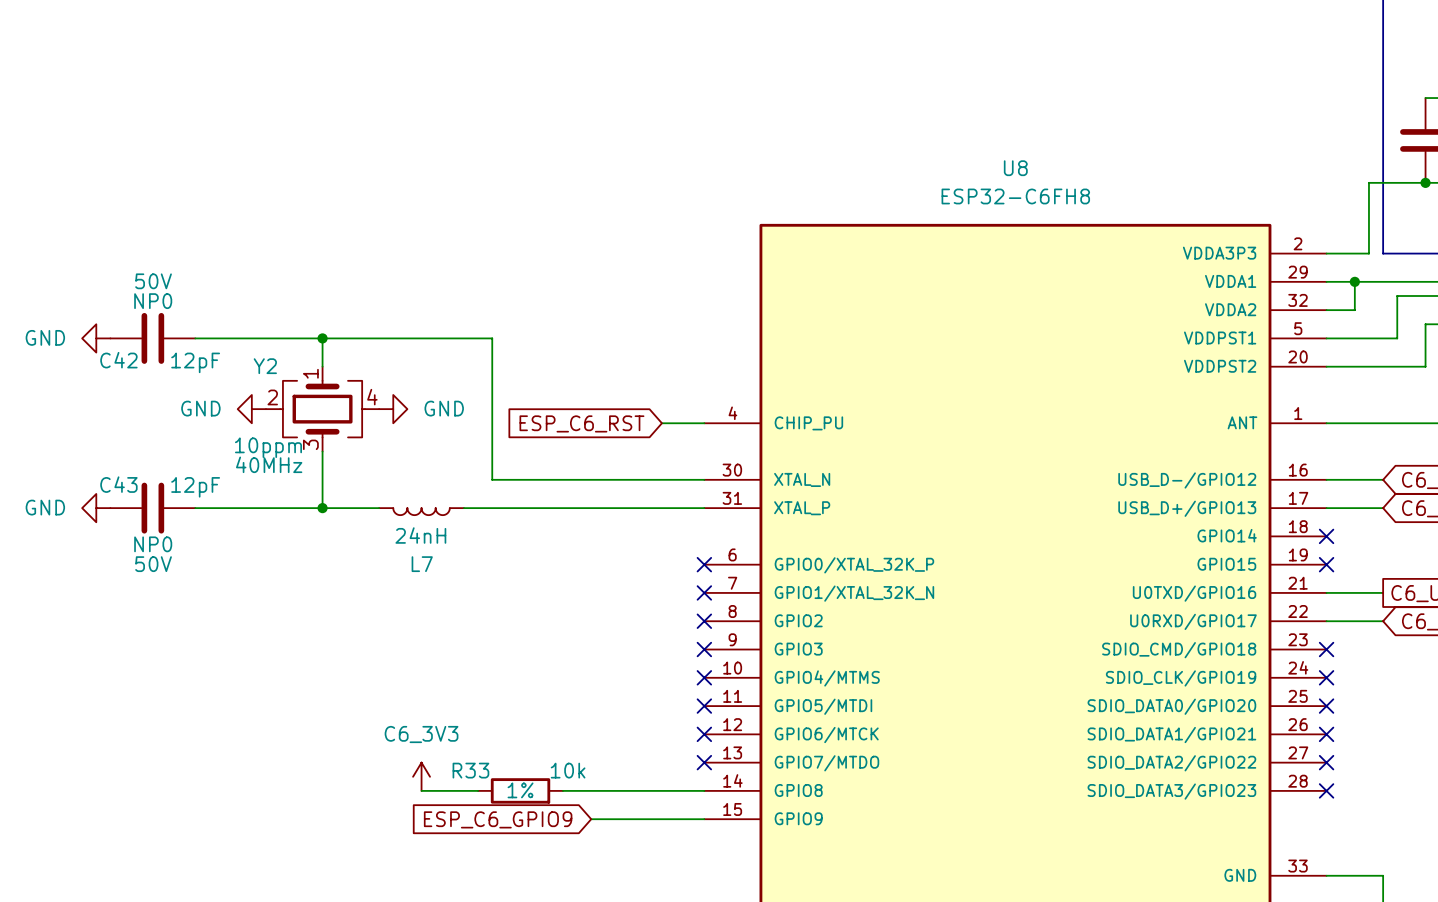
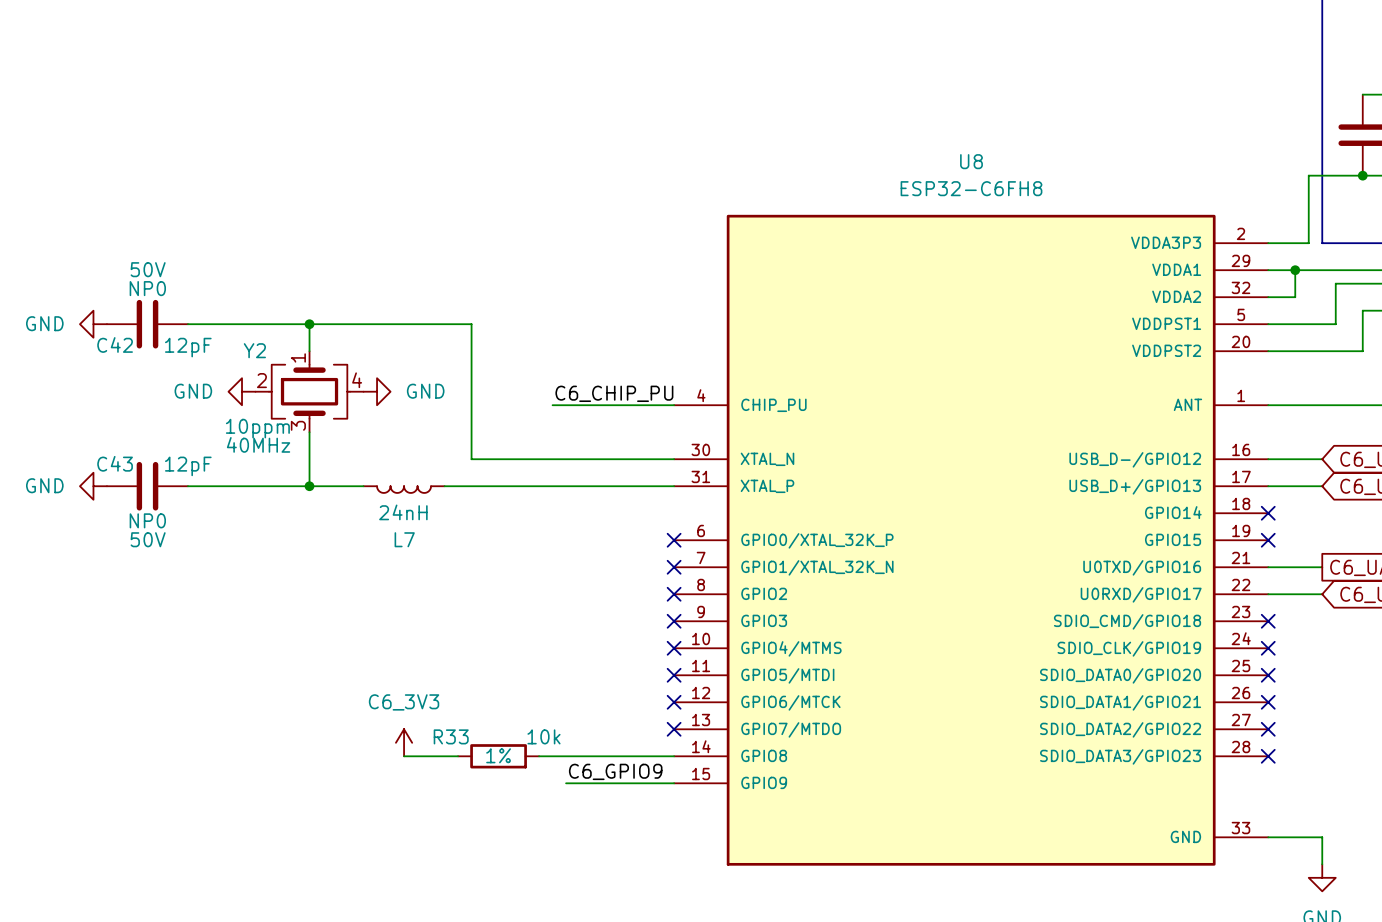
label: none -> C6_CHIP_PU (614, 393)
wire: none -> (552, 405) (633, 405)
global label: ESP_C6_RST (581, 423) -> none
label: none -> C6_GPIO9 (615, 771)
global label: ESP_C6_GPIO9 (498, 819) -> none

